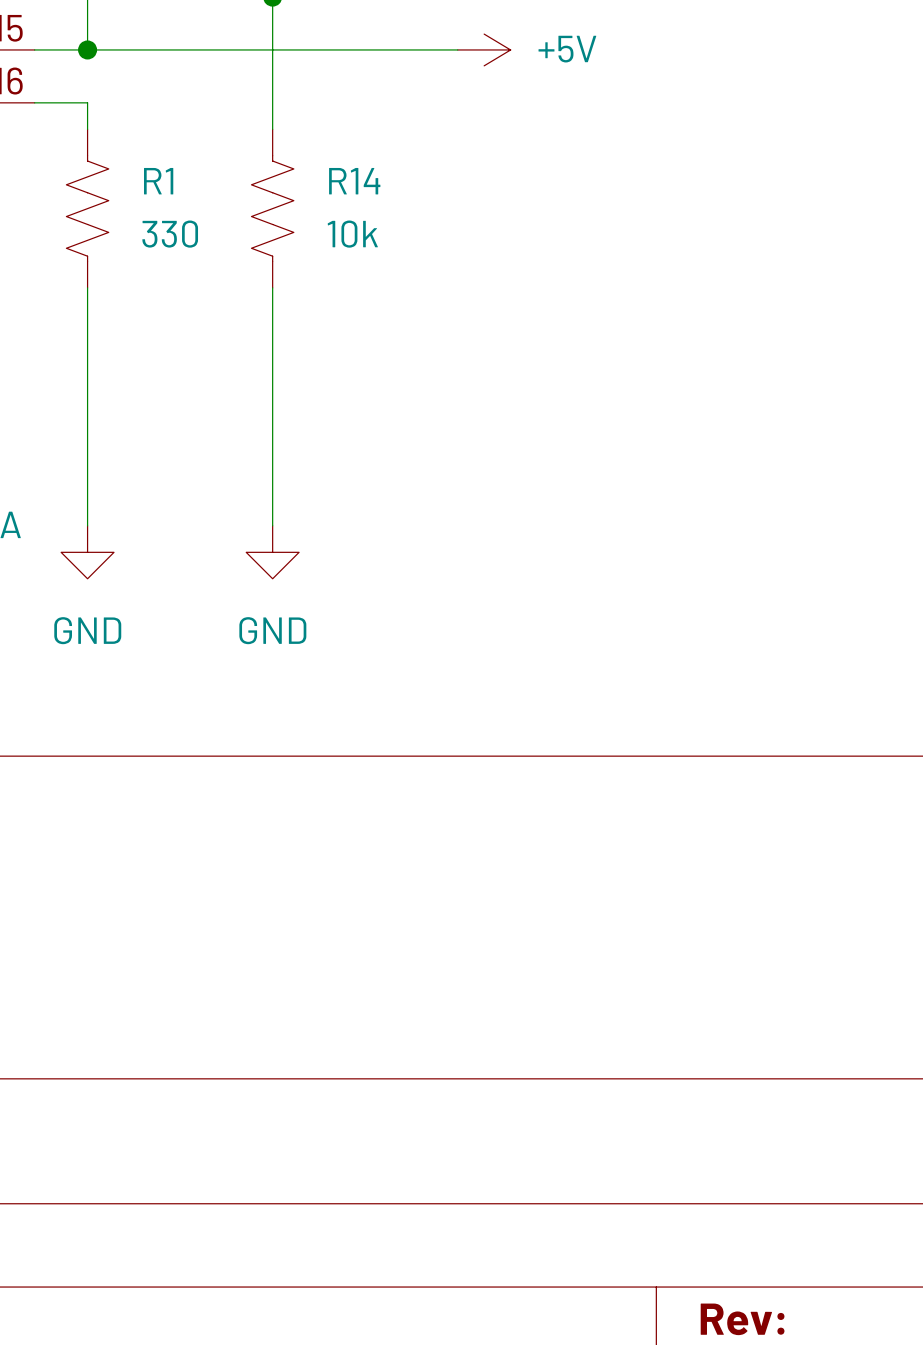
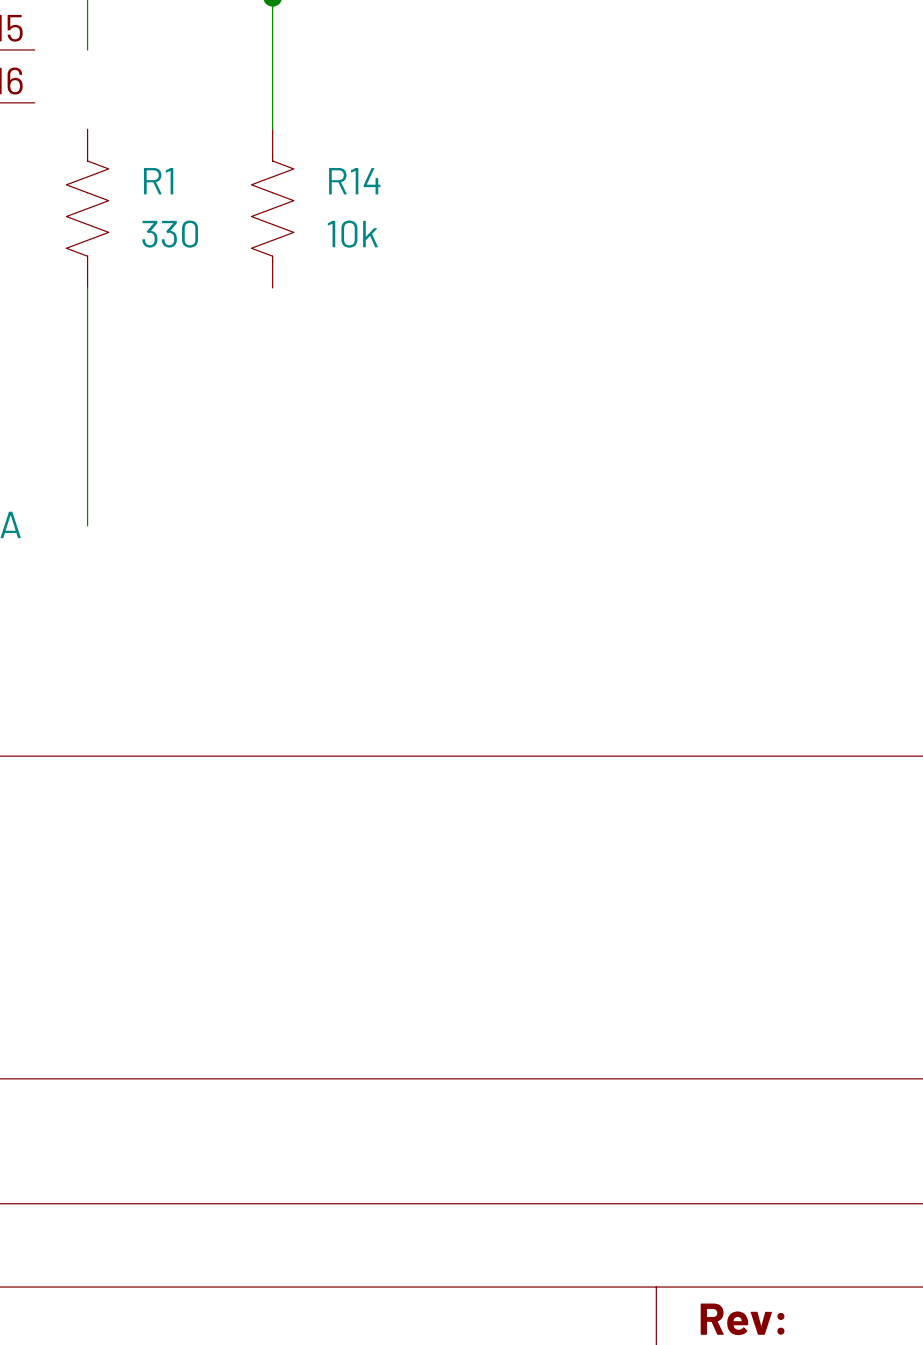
wire: (34, 49) (457, 49) -> none
junction: (87, 49) -> none
power symbol: +5V (484, 49) -> none
wire: (34, 102) (87, 102) (87, 129) -> none
wire: (272, 287) (272, 525) -> none
power symbol: GND (87, 552) -> none
power symbol: GND (272, 552) -> none

